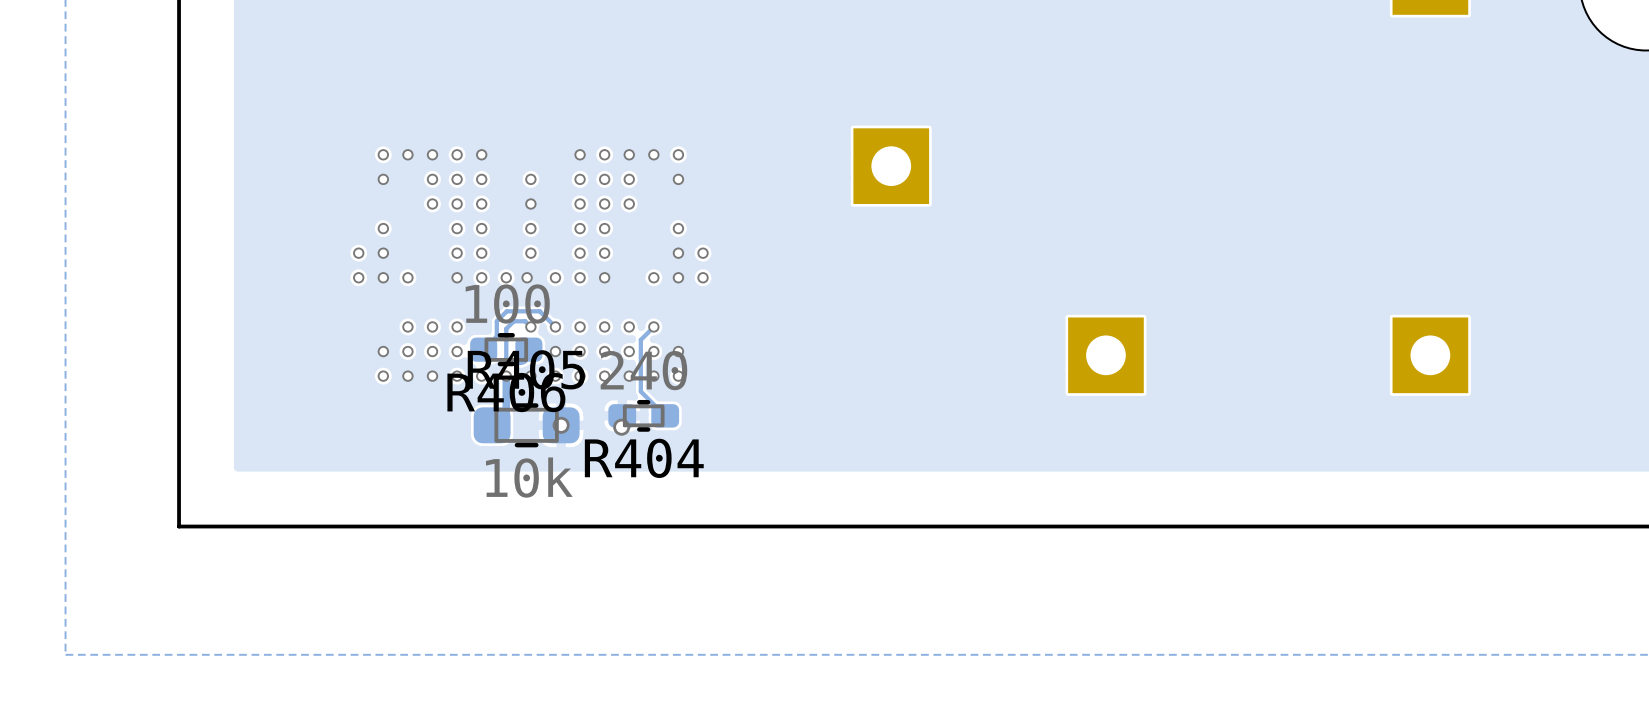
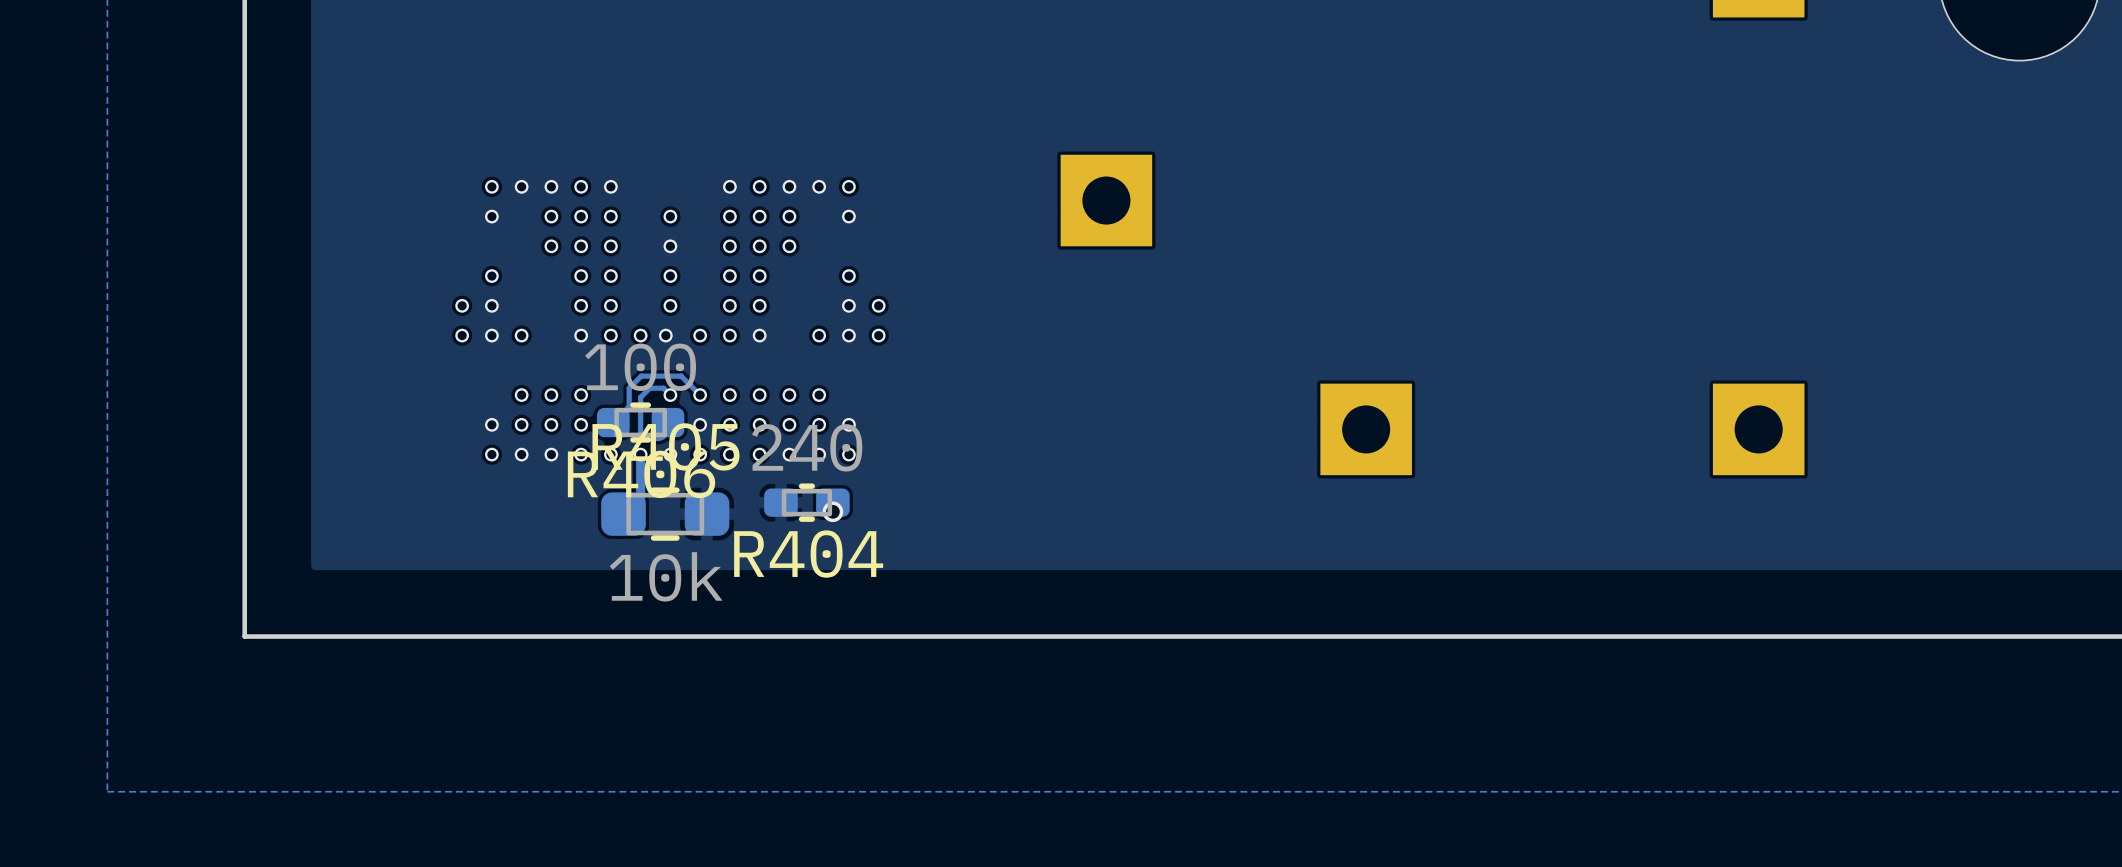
track: (653, 326) (640, 339) (640, 391) (665, 415) -> none
via: (561, 425) -> none
via position: (621, 427) -> (832, 511)

